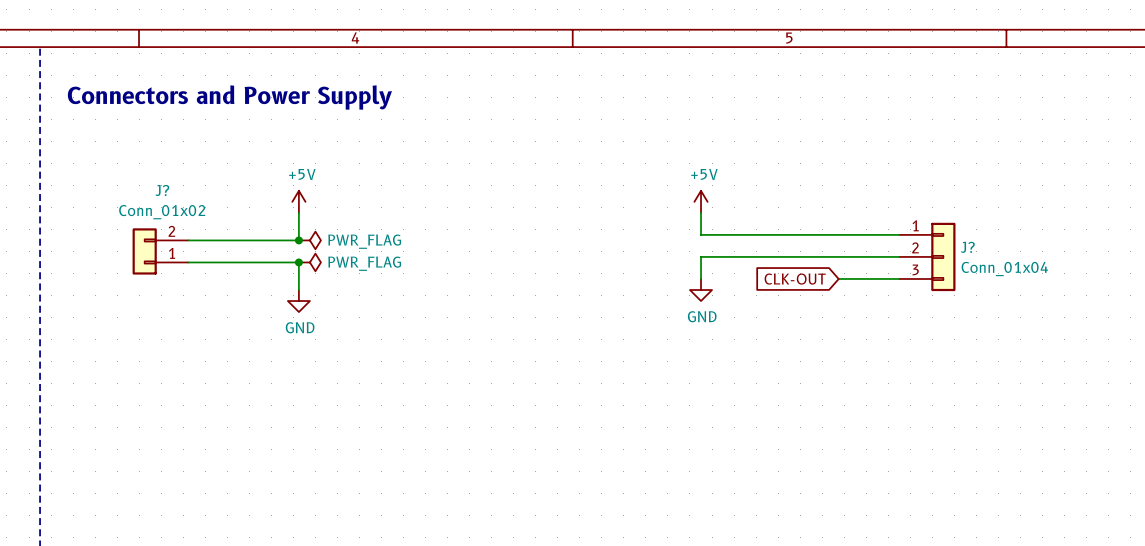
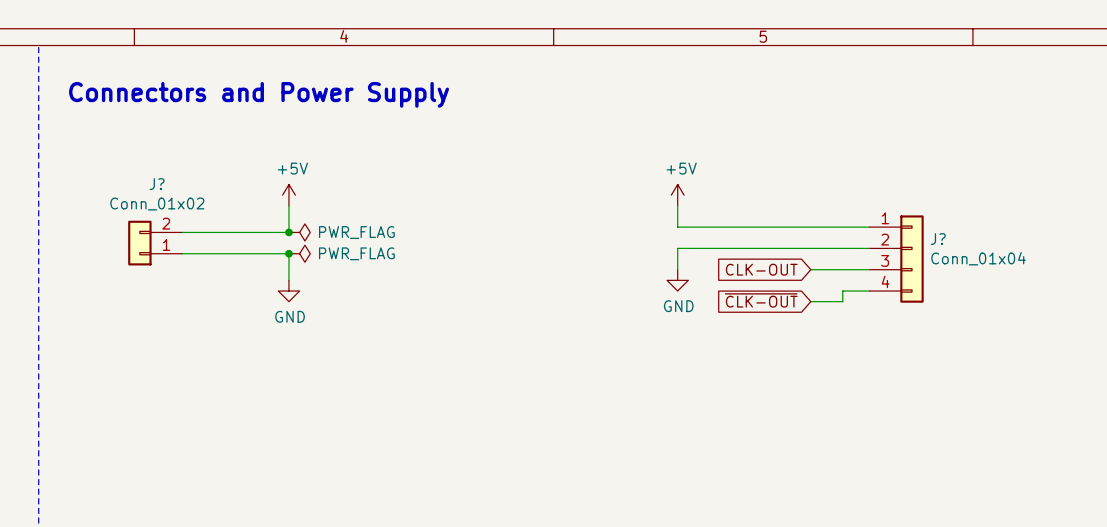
J?: Conn_01x04 (927, 256) -> none
J?: none -> Conn_01x04 (896, 259)
wire: none -> (869, 291) (842, 291) (842, 301) (810, 301)
global label: none -> ~{CLK-OUT} (761, 300)

